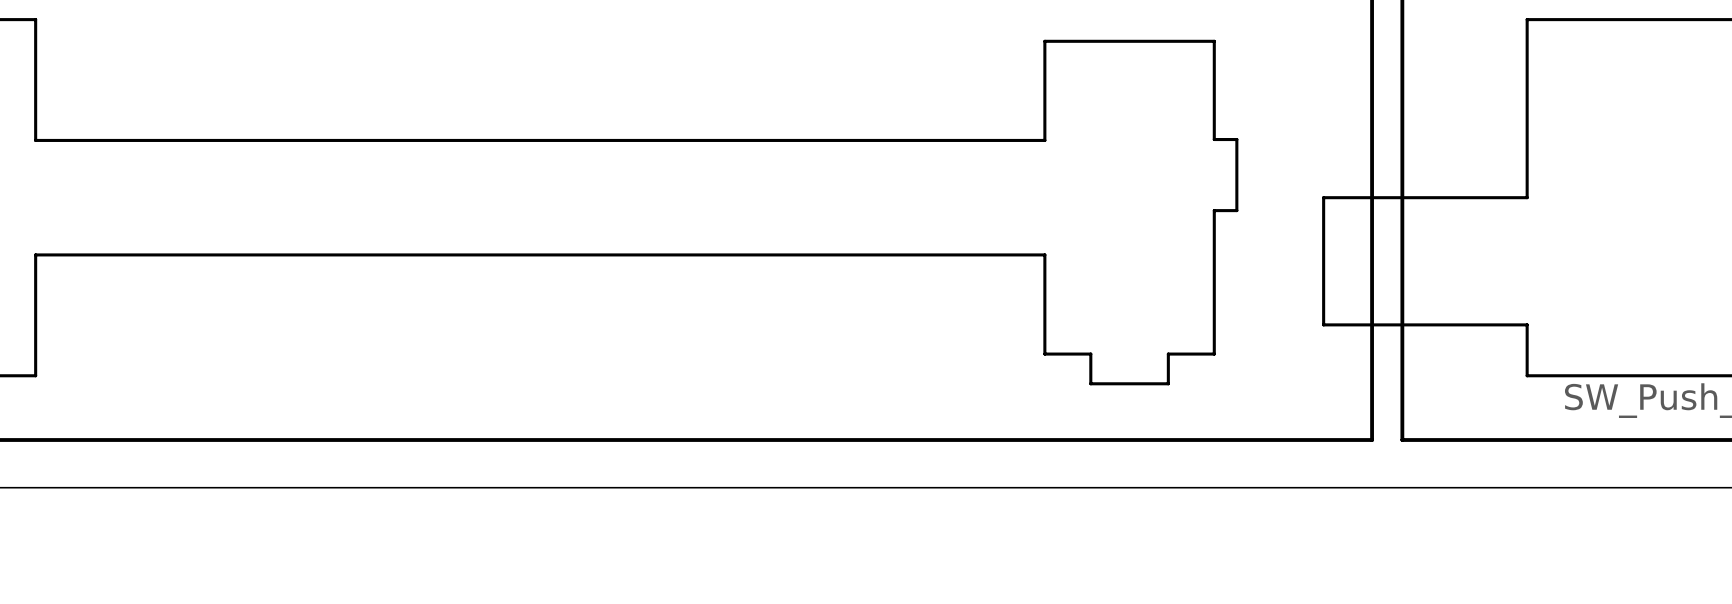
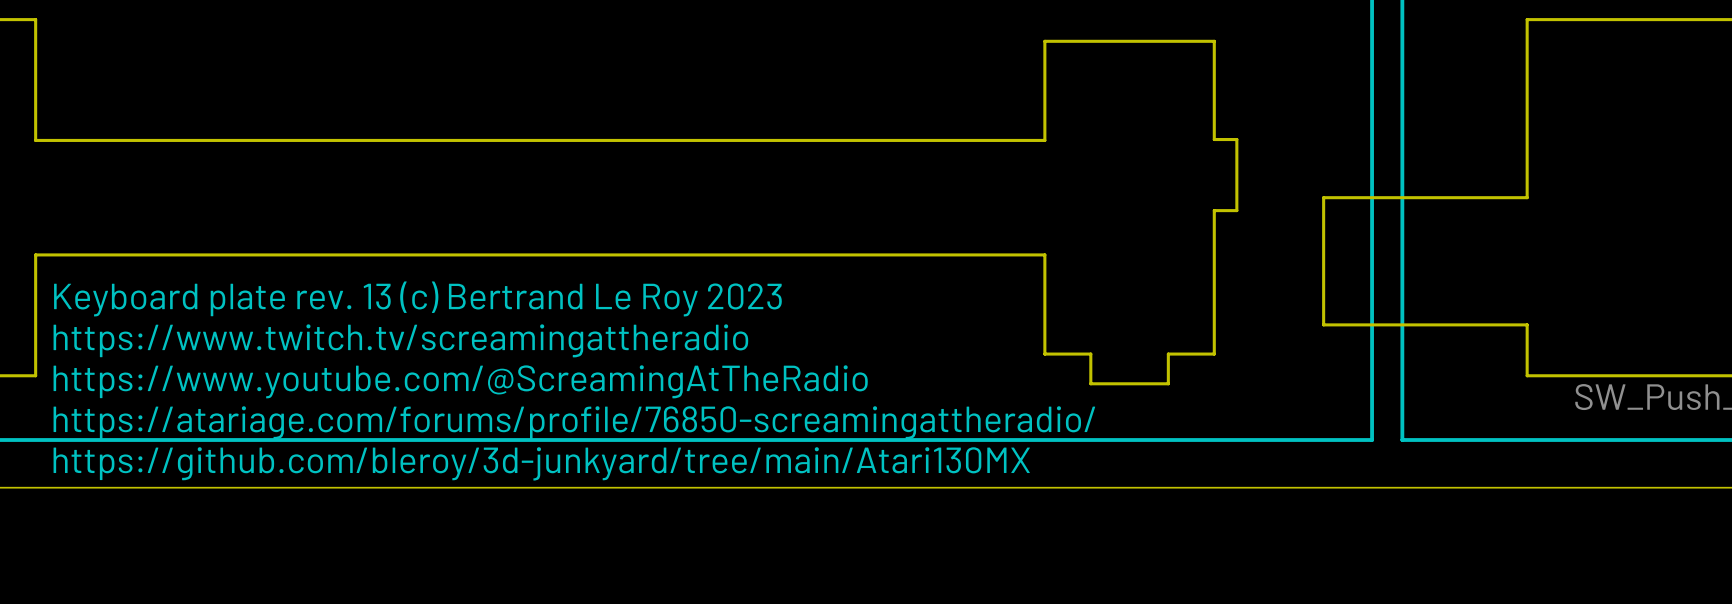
text: none -> Keyboard plate rev. 13 (c) Bertrand Le Roy 2023 (417, 298)
text: none -> https://www.twitch.tv/screamingattheradio (400, 340)
text: none -> https://www.youtube.com/@ScreamingAtTheRadio (460, 381)
text: none -> https://atariage.com/forums/profile/76850-screamingattheradio/ (574, 422)
text: none -> https://github.com/bleroy/3d-junkyard/tree/main/Atari130MX (541, 463)

